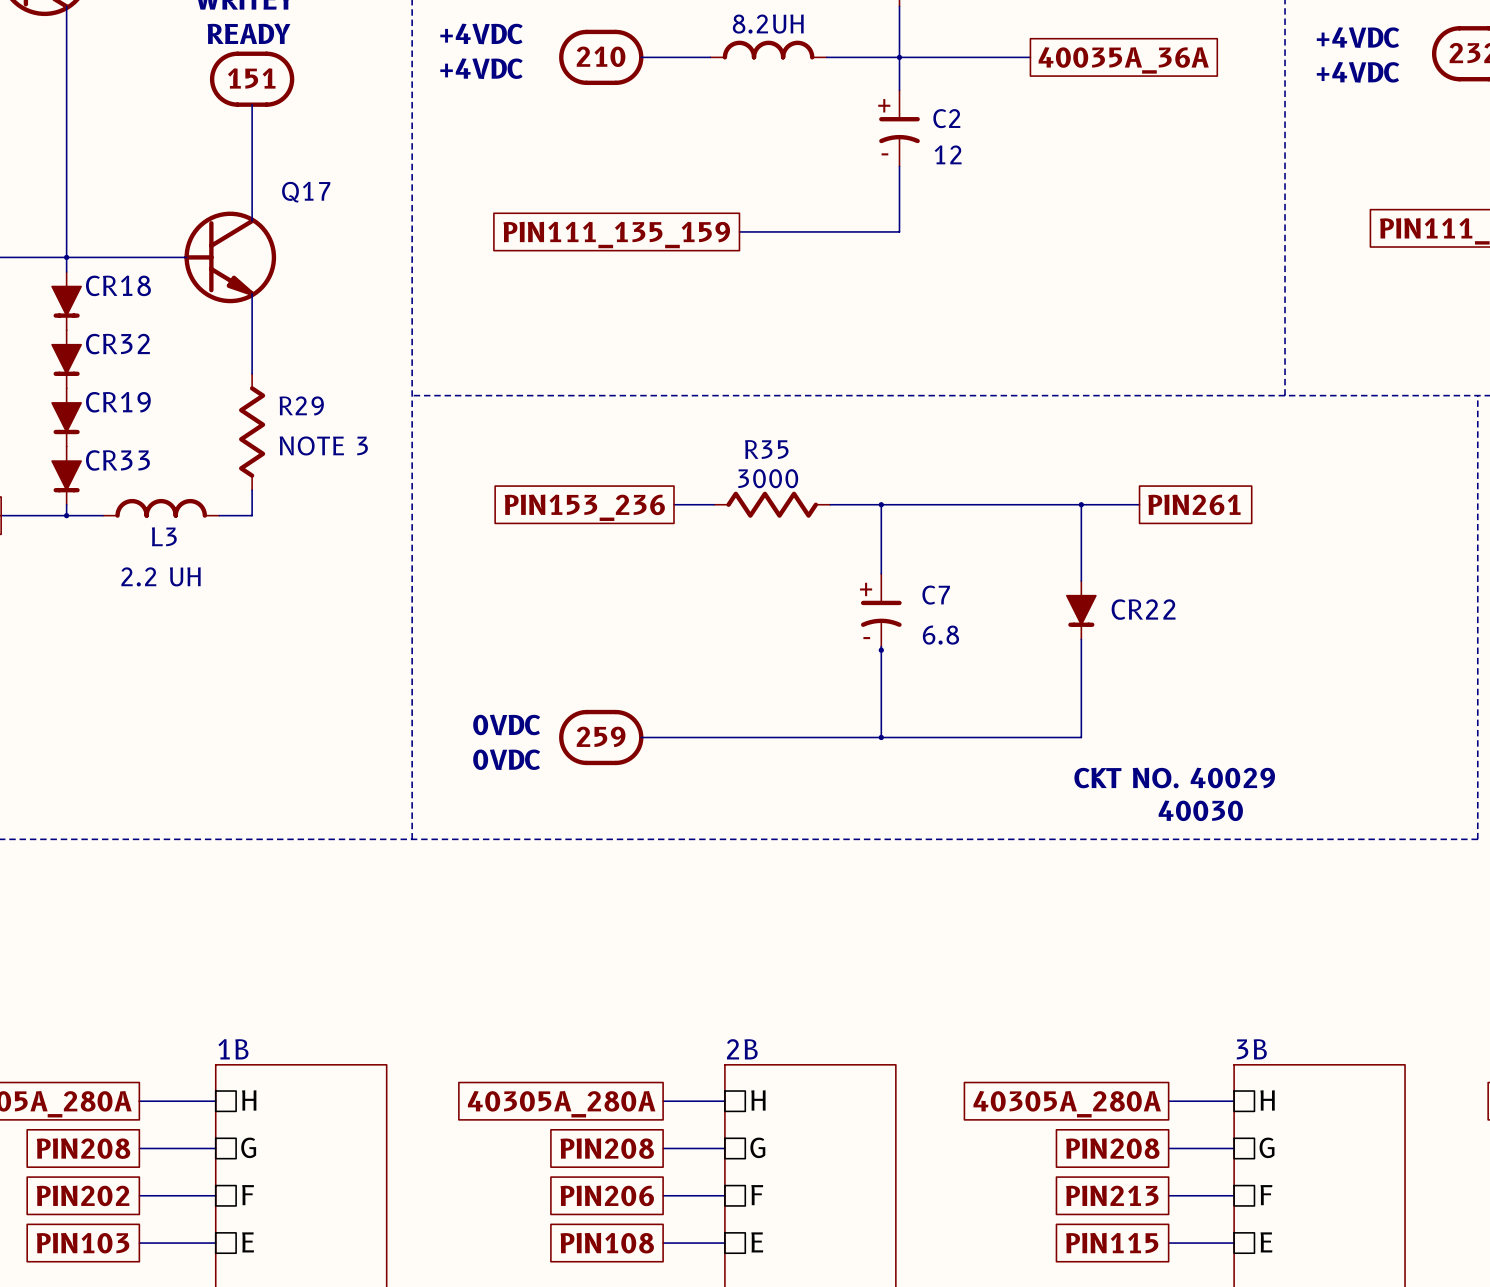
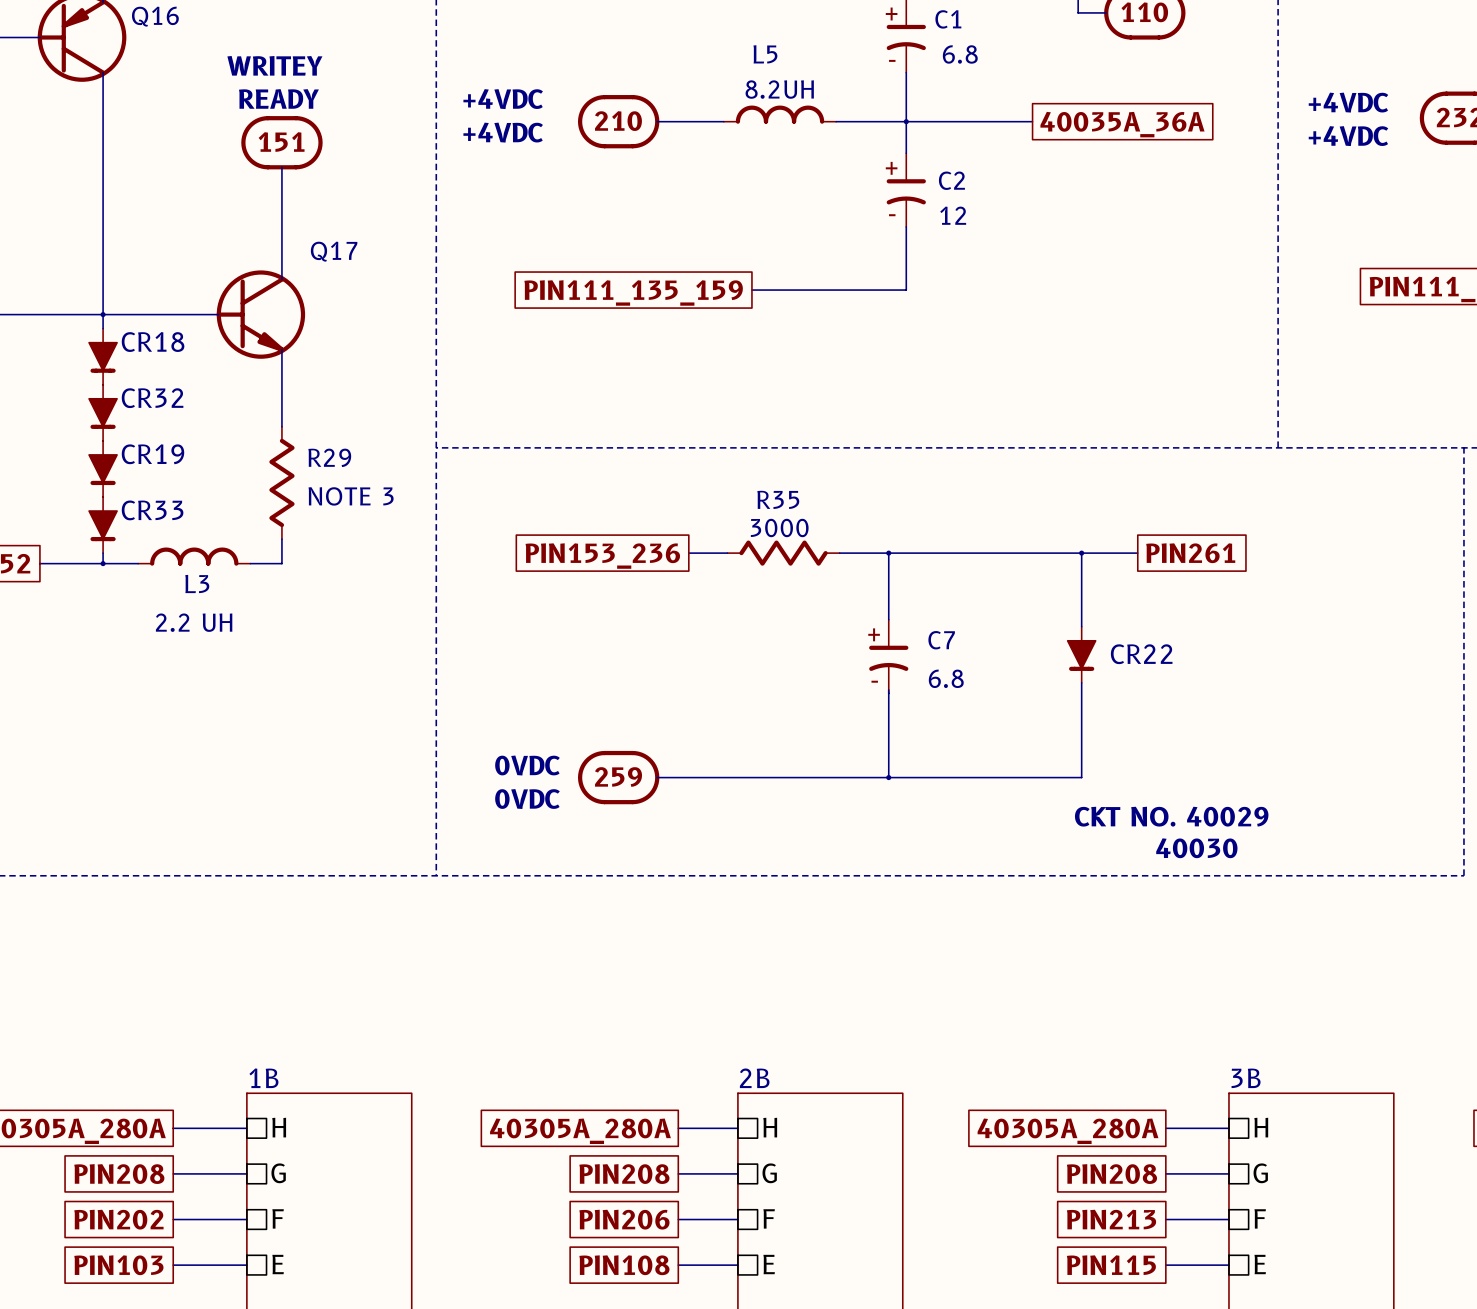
junction: (881, 650) -> none

